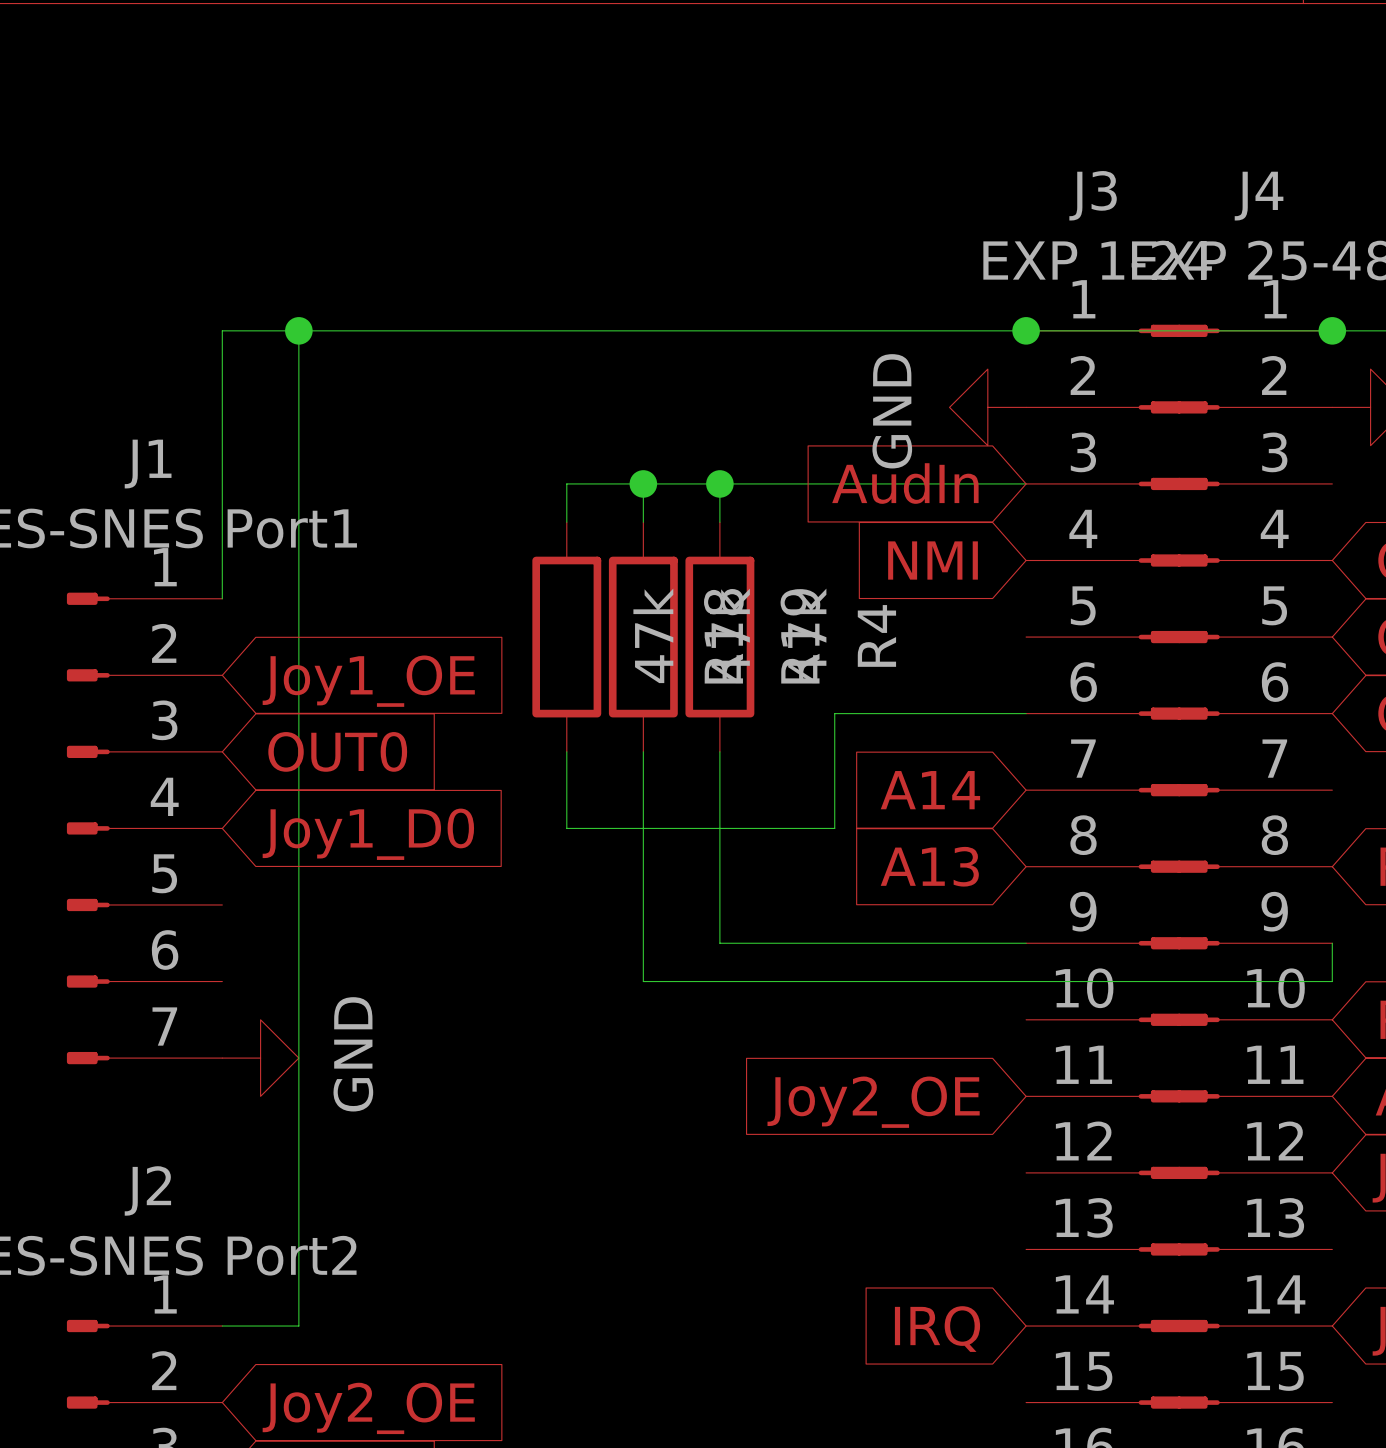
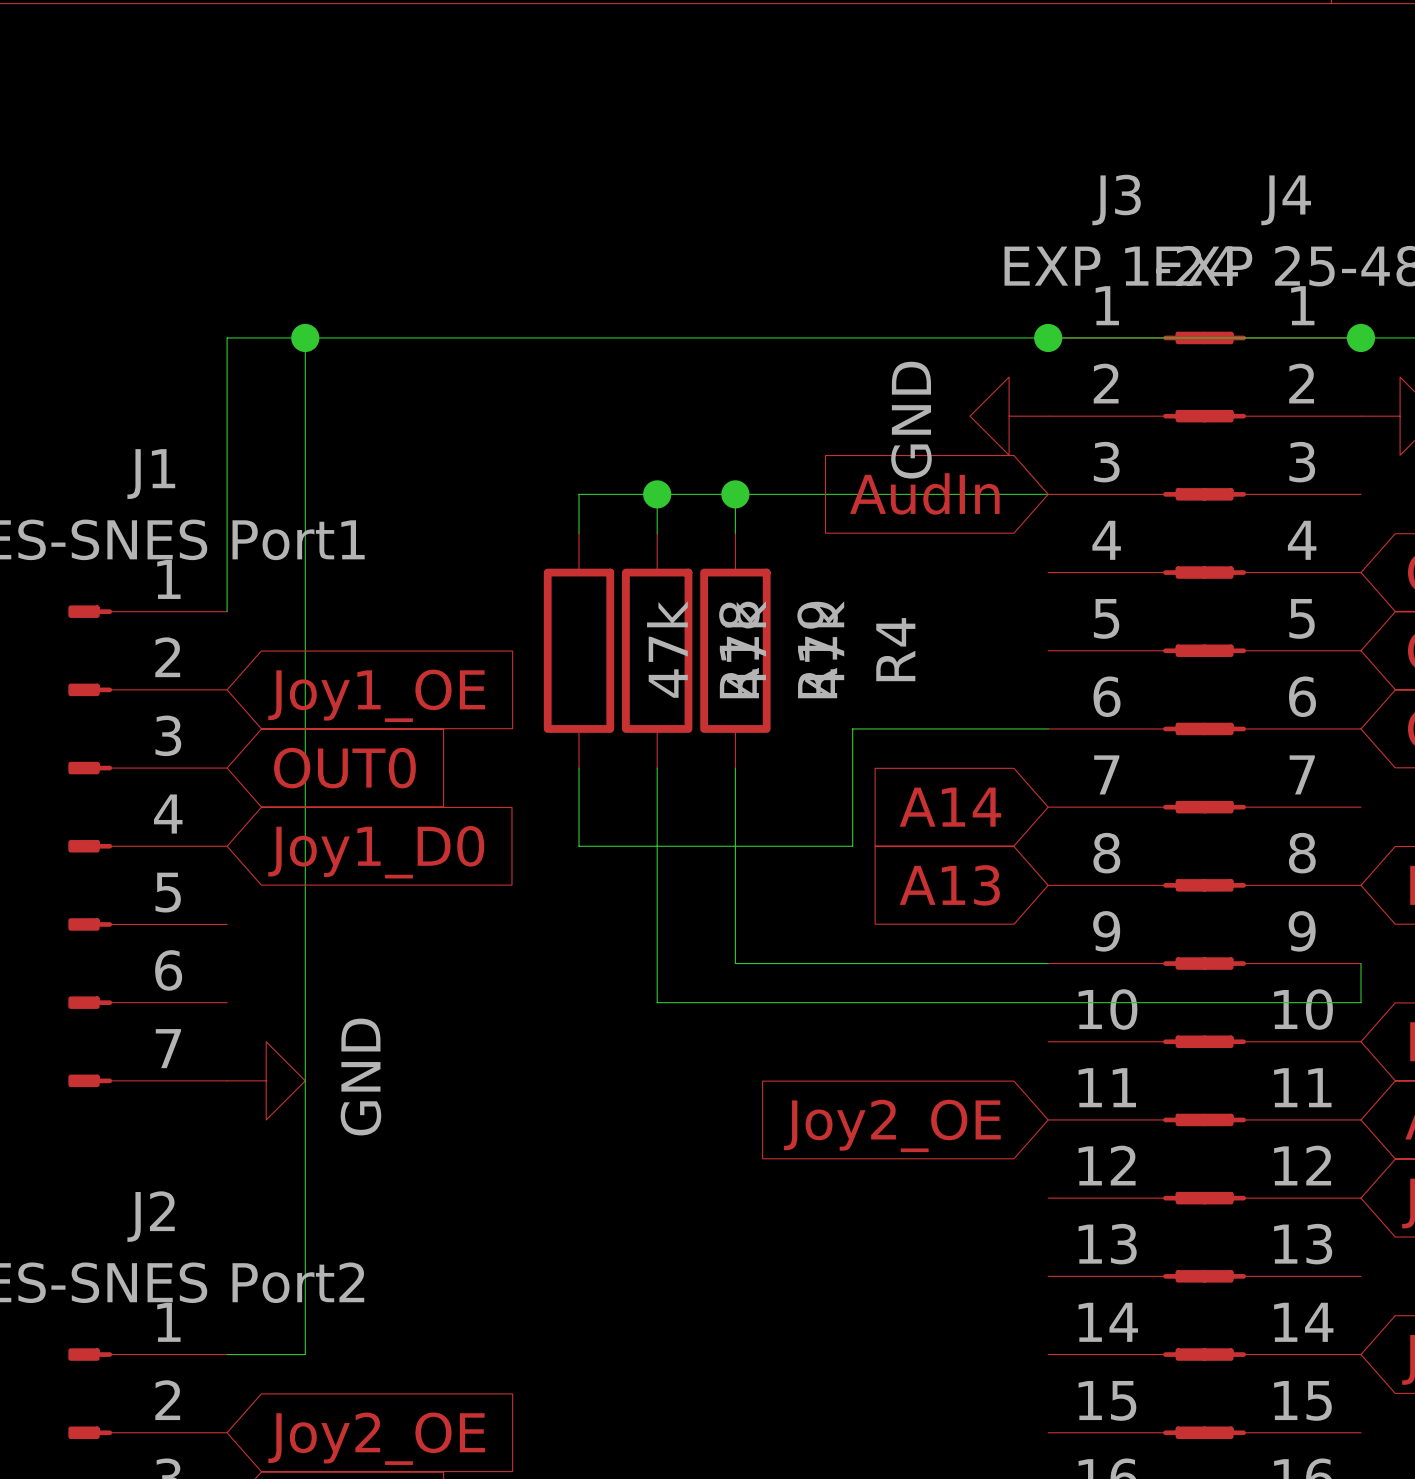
global label: NMI (933, 560) -> none
global label: IRQ (937, 1329) -> none

